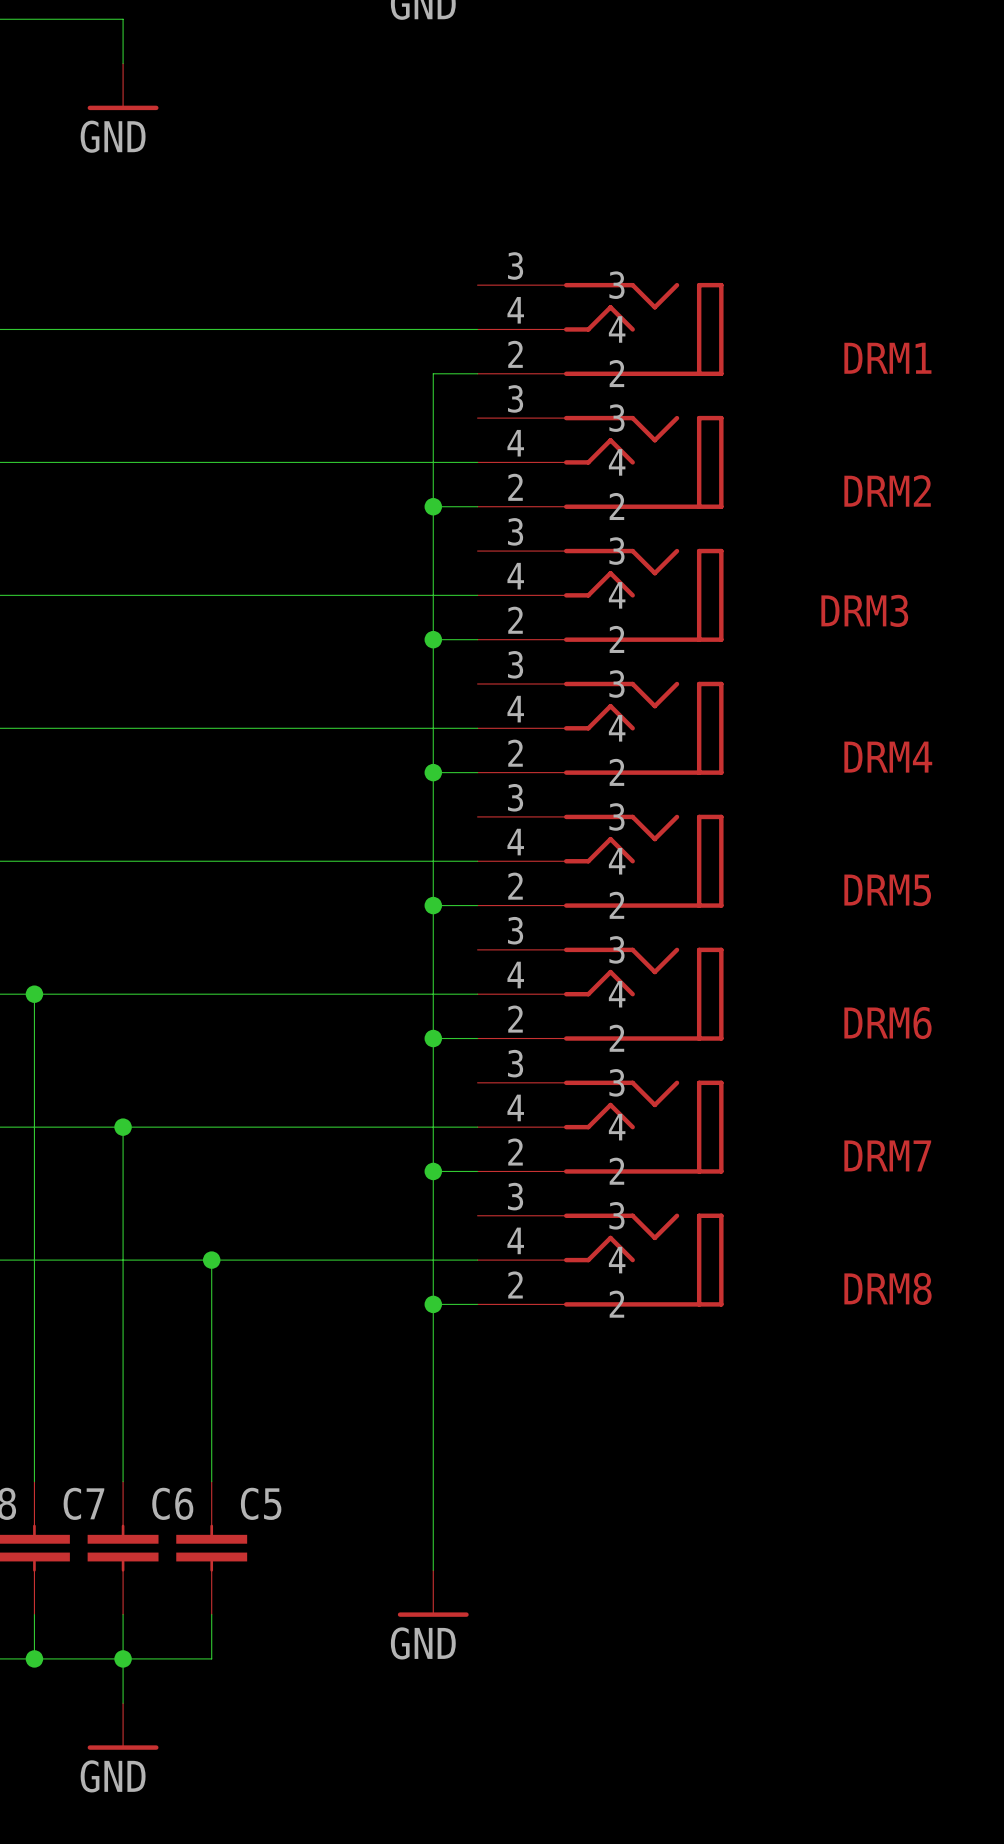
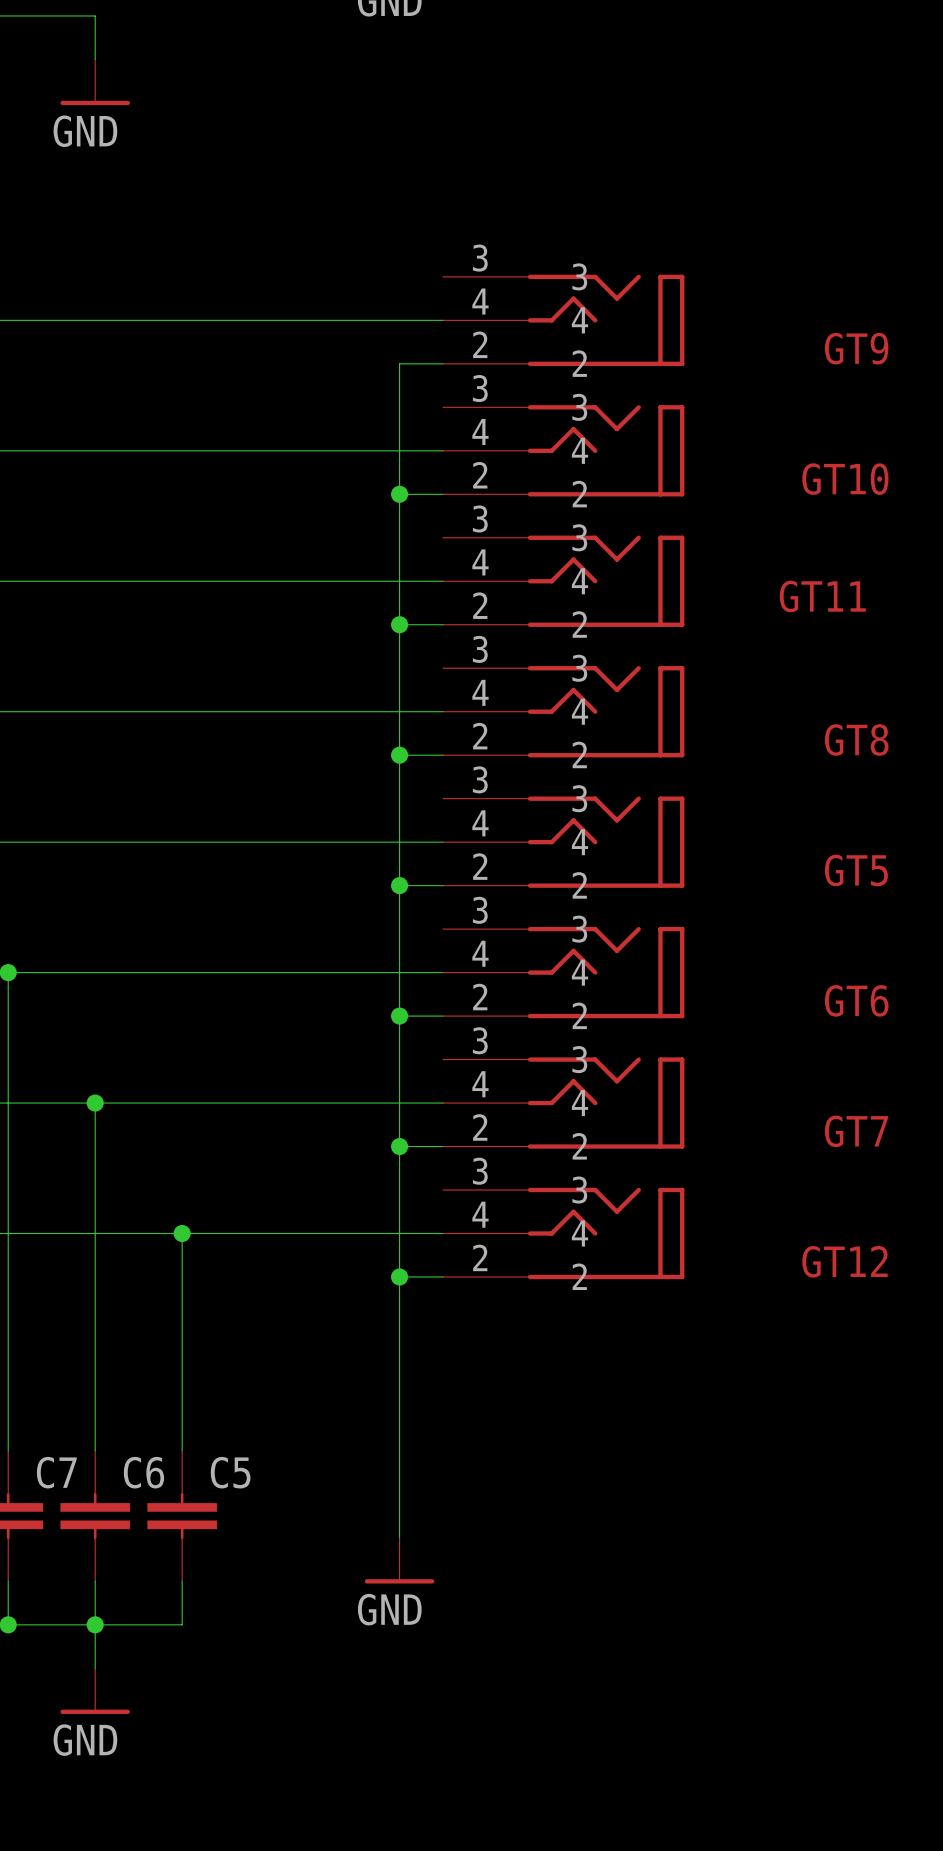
DRM1 name: DRM1 (887, 358) -> GT9 (856, 348)
DRM2 name: DRM2 (887, 490) -> GT10 (845, 479)
DRM3 name: DRM3 (864, 610) -> GT11 (822, 596)
DRM4 name: DRM4 (888, 757) -> GT8 (856, 740)
DRM5 name: DRM5 (887, 890) -> GT5 (856, 870)
DRM6 name: DRM6 (887, 1023) -> GT6 (856, 1000)
DRM7 name: DRM7 (887, 1155) -> GT7 (856, 1131)
DRM8 name: DRM8 (887, 1288) -> GT12 (845, 1261)

